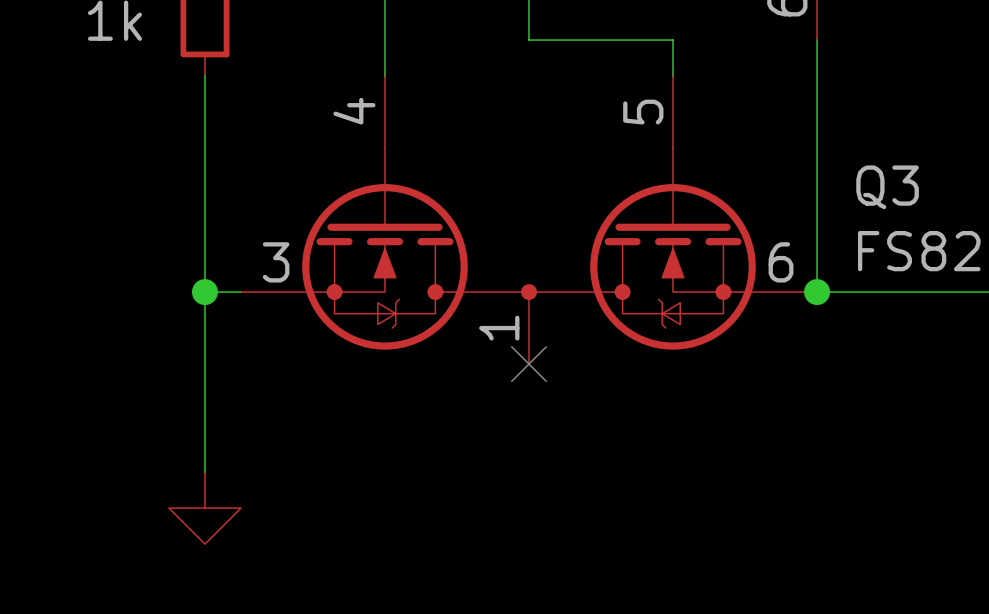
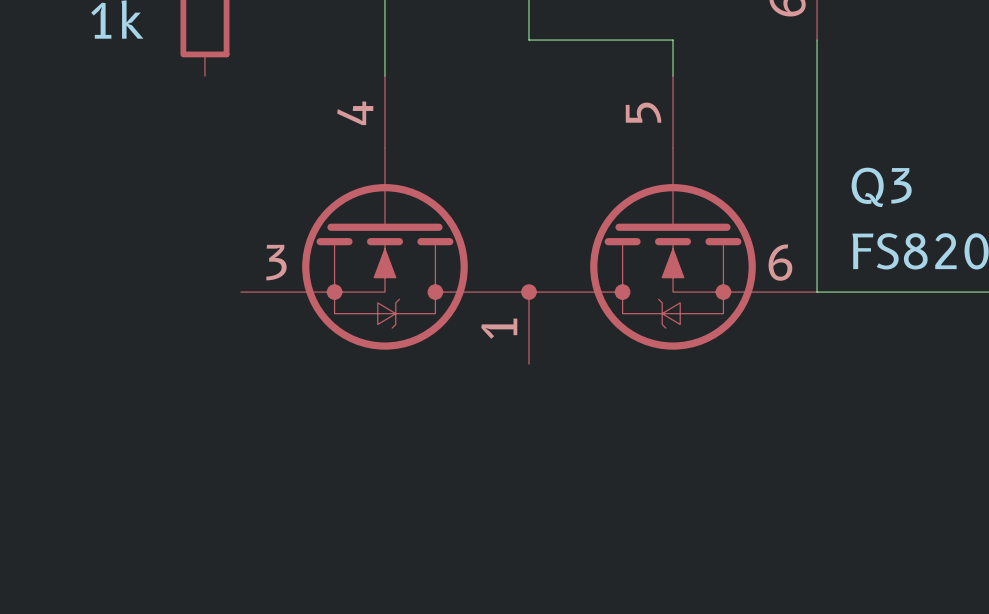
wire: (204, 76) (204, 472) -> none
wire: (204, 292) (240, 292) -> none
junction: (204, 292) -> none
junction: (817, 292) -> none
no-connect mark: (529, 364) -> none
power symbol: (204, 508) -> none

